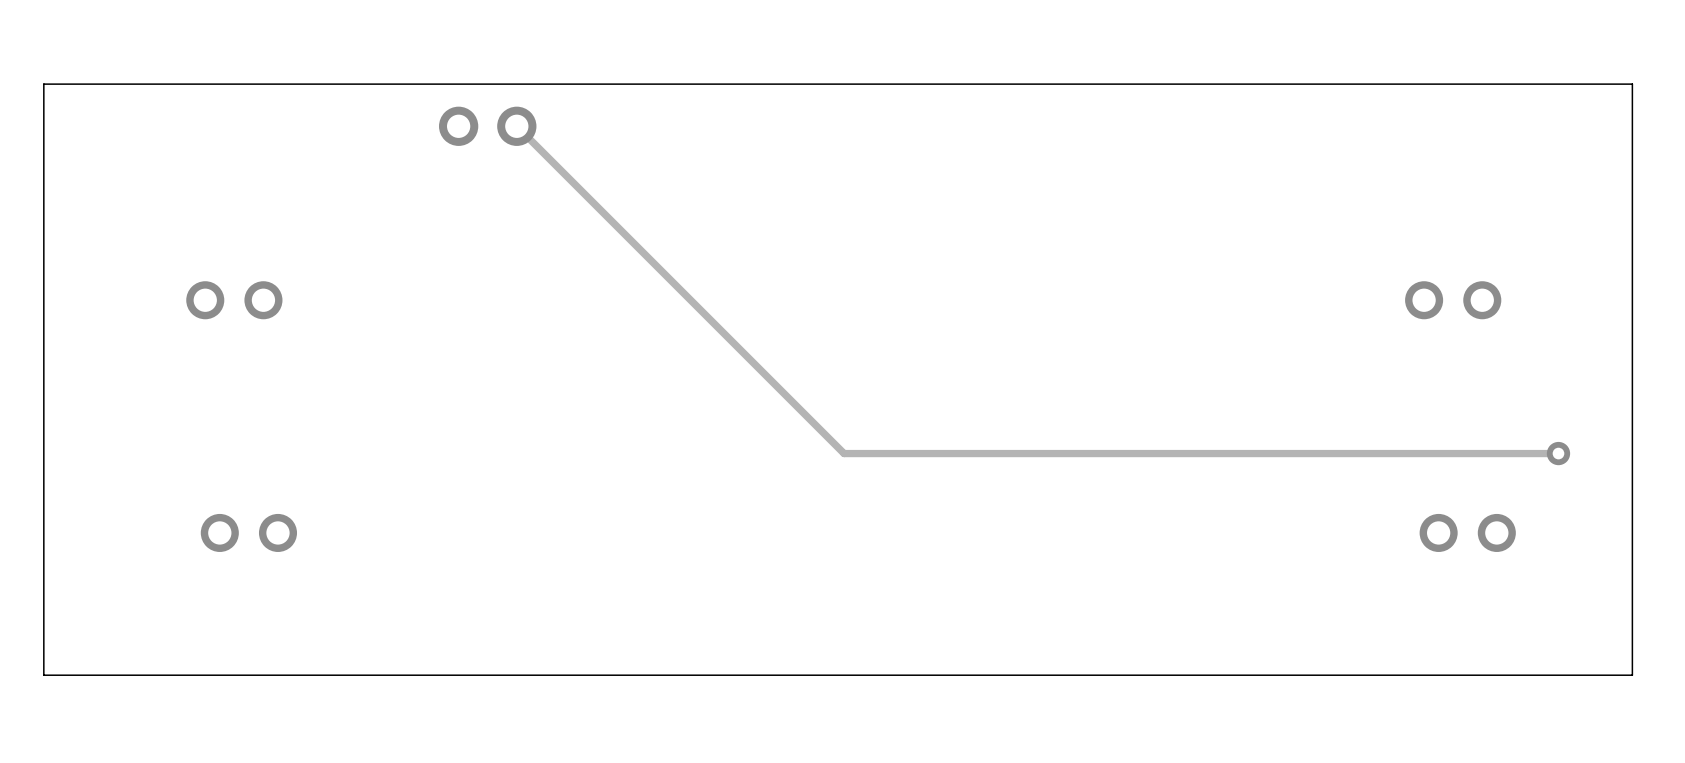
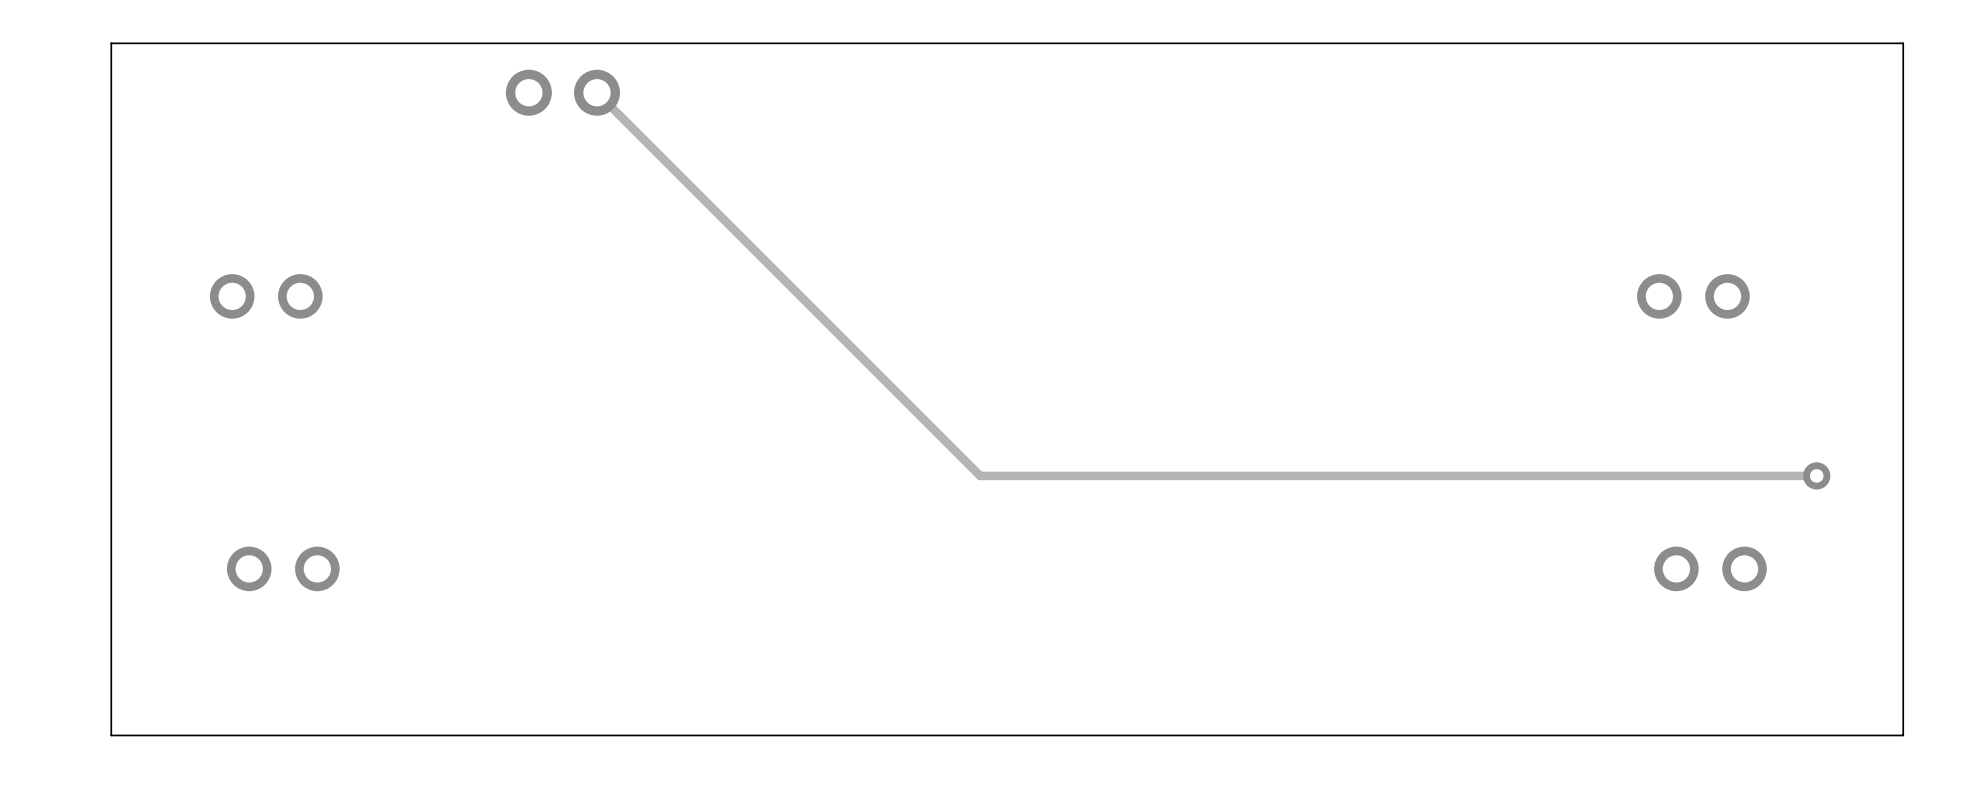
board edge: (102, 84) (43, 84) (43, 675) (102, 675) -> (111, 43) (111, 735)

